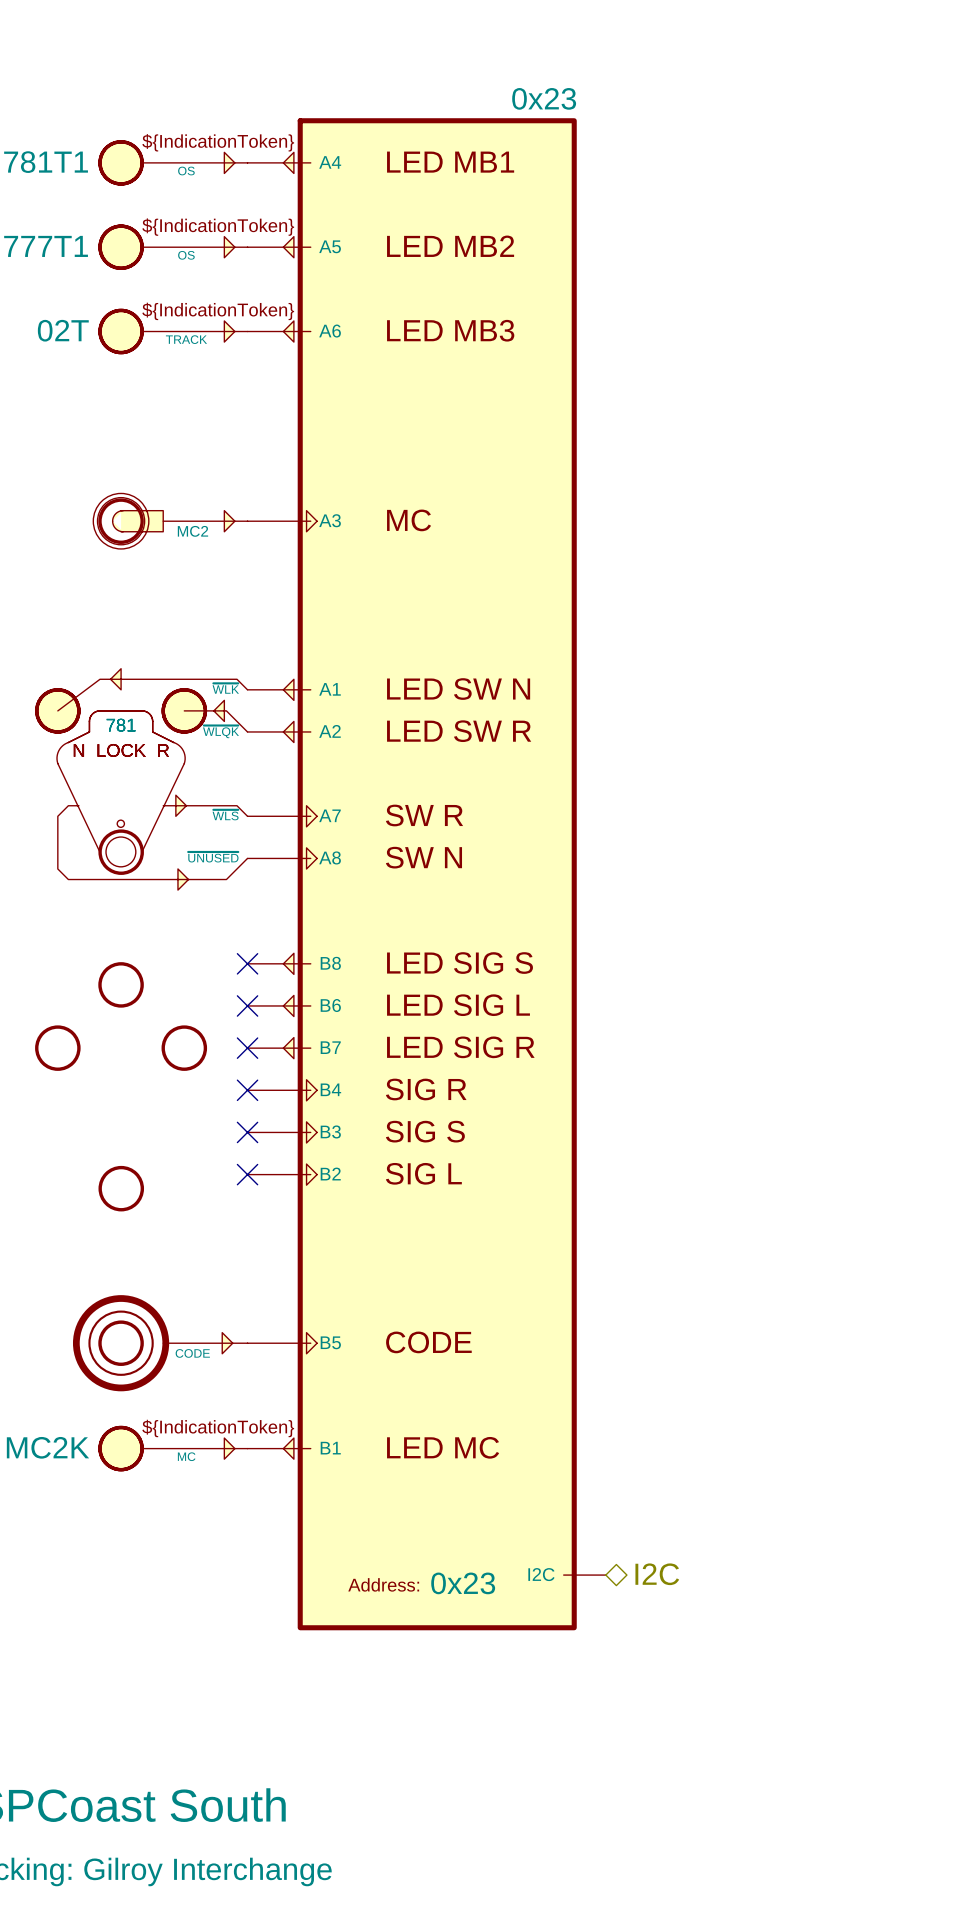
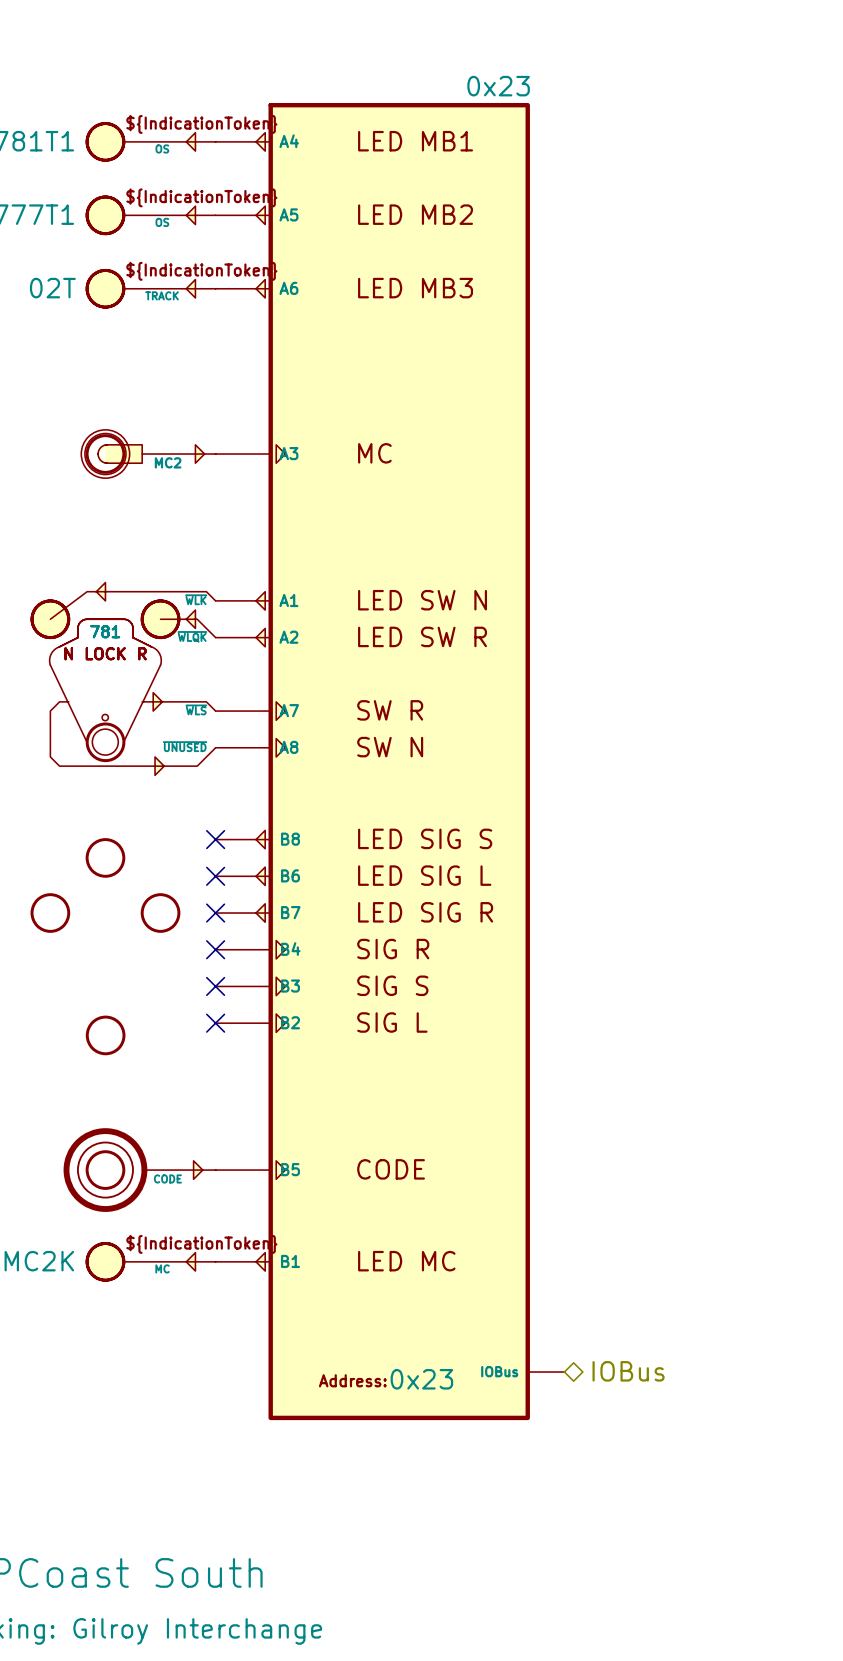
part symbol: [98, 140, 248, 186] -> [85, 122, 216, 162]
part symbol: [98, 224, 248, 270] -> [85, 195, 216, 236]
part symbol: [98, 308, 248, 355] -> [85, 268, 216, 309]
part: 0x23 (426, 874) -> none
part: none -> 0x23 (390, 761)
part symbol: [98, 1425, 248, 1472] -> [85, 1242, 216, 1282]
hierarchical label: I2C (657, 1574) -> none
hierarchical label: none -> IOBus (628, 1371)

